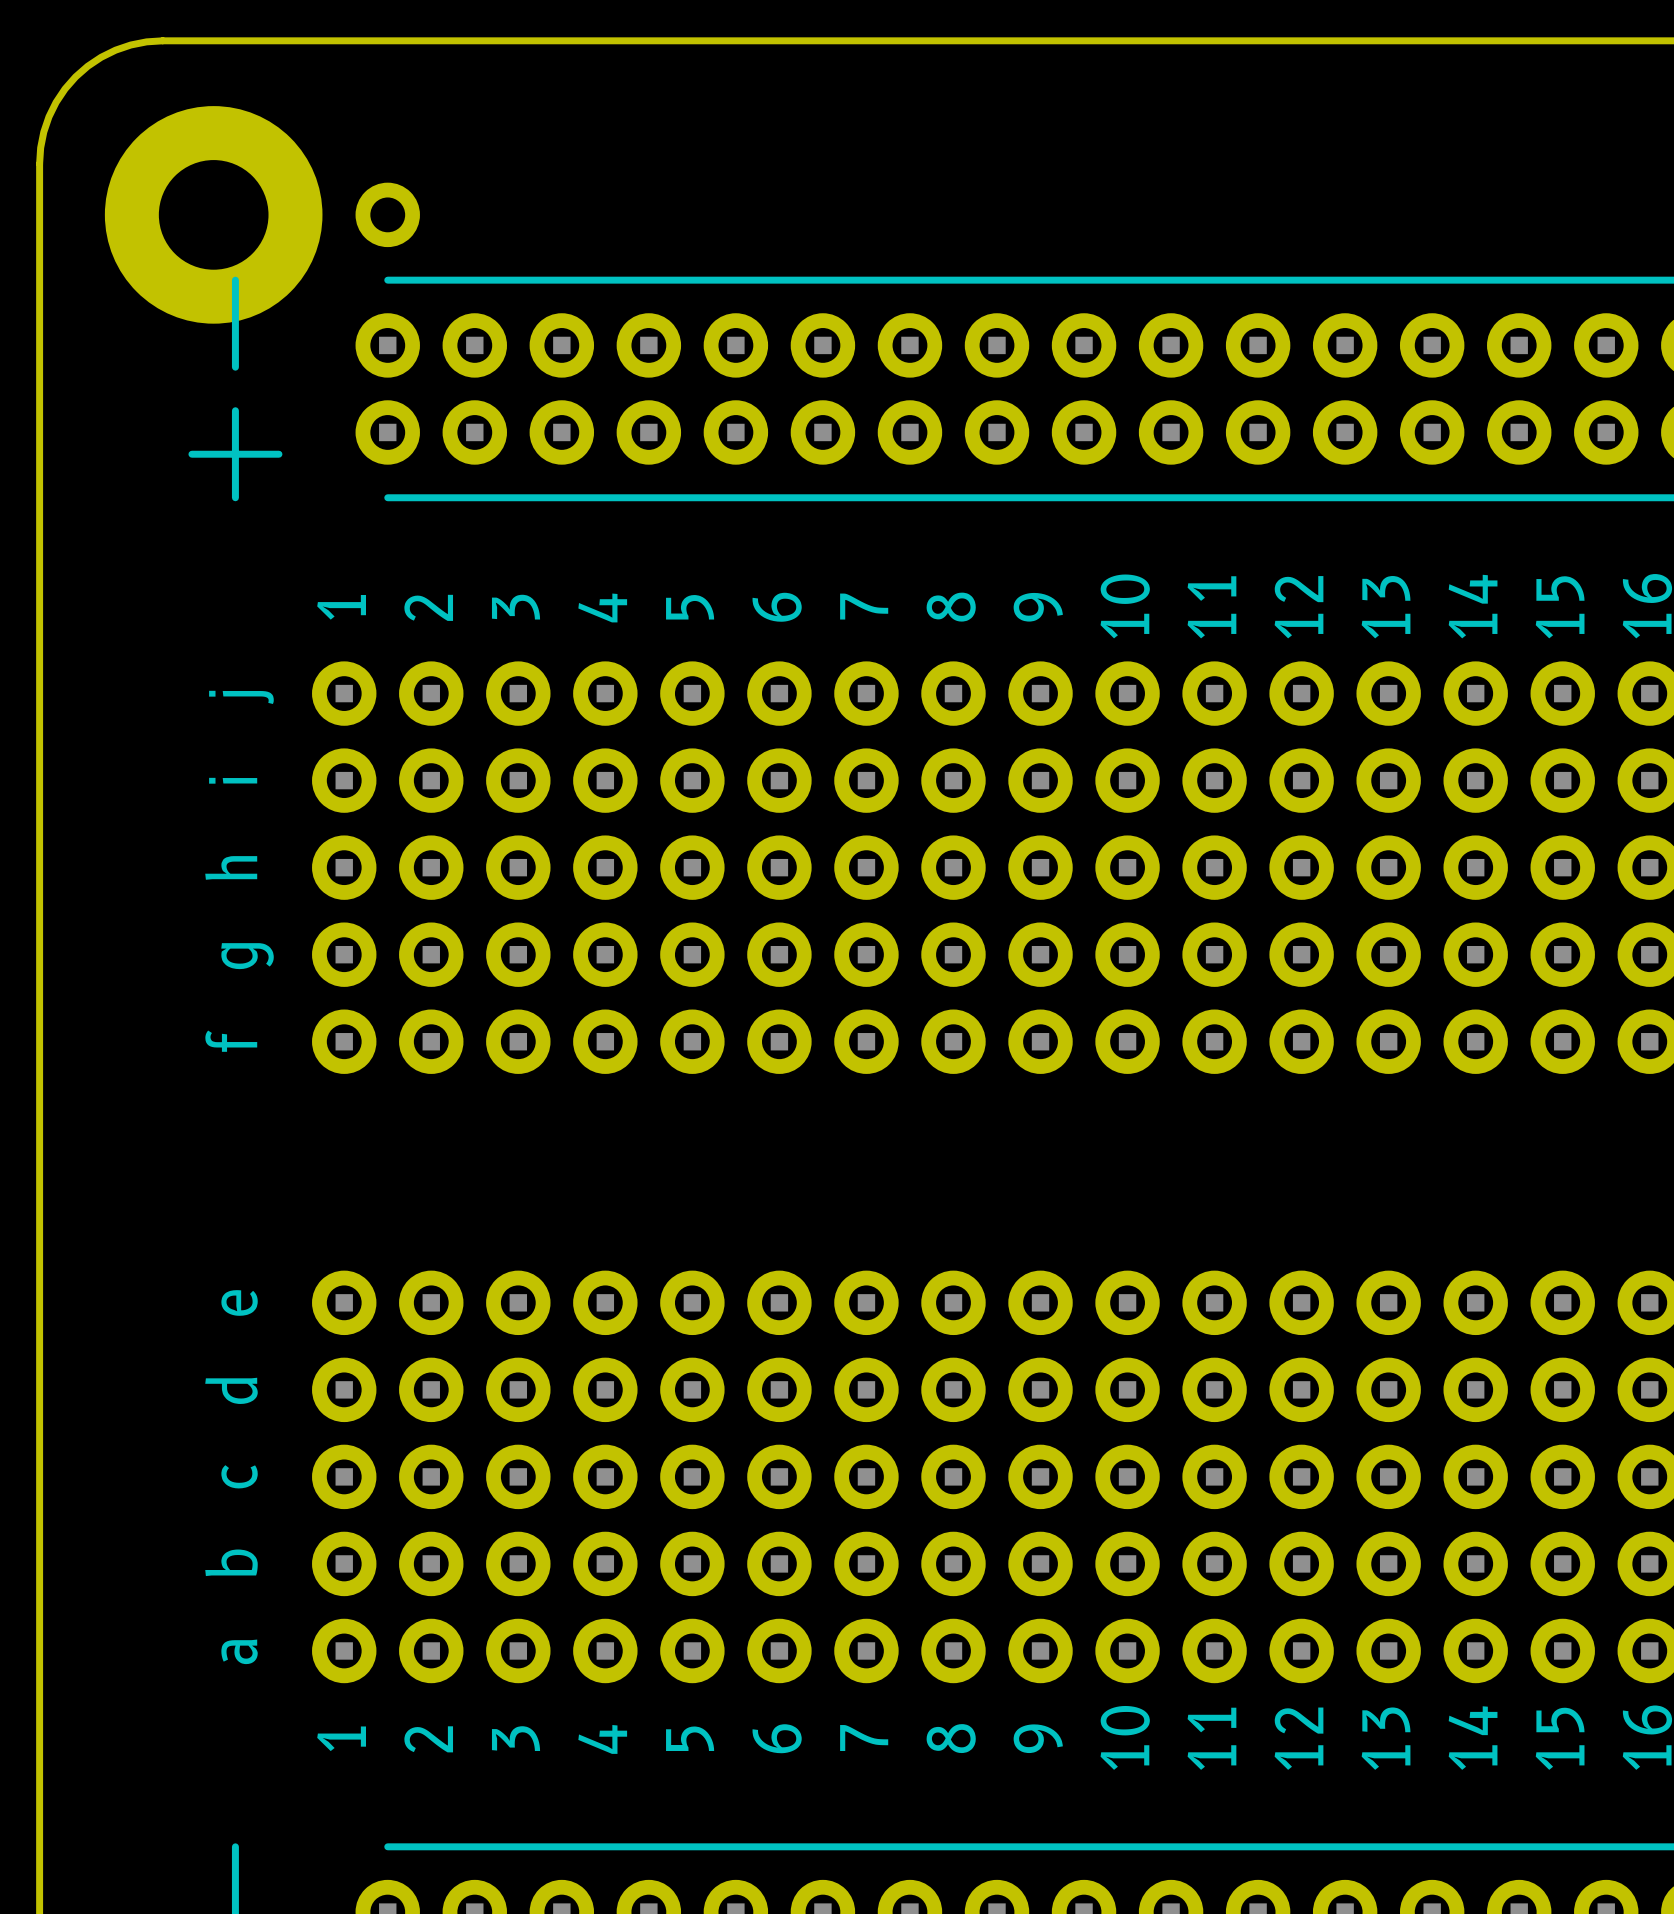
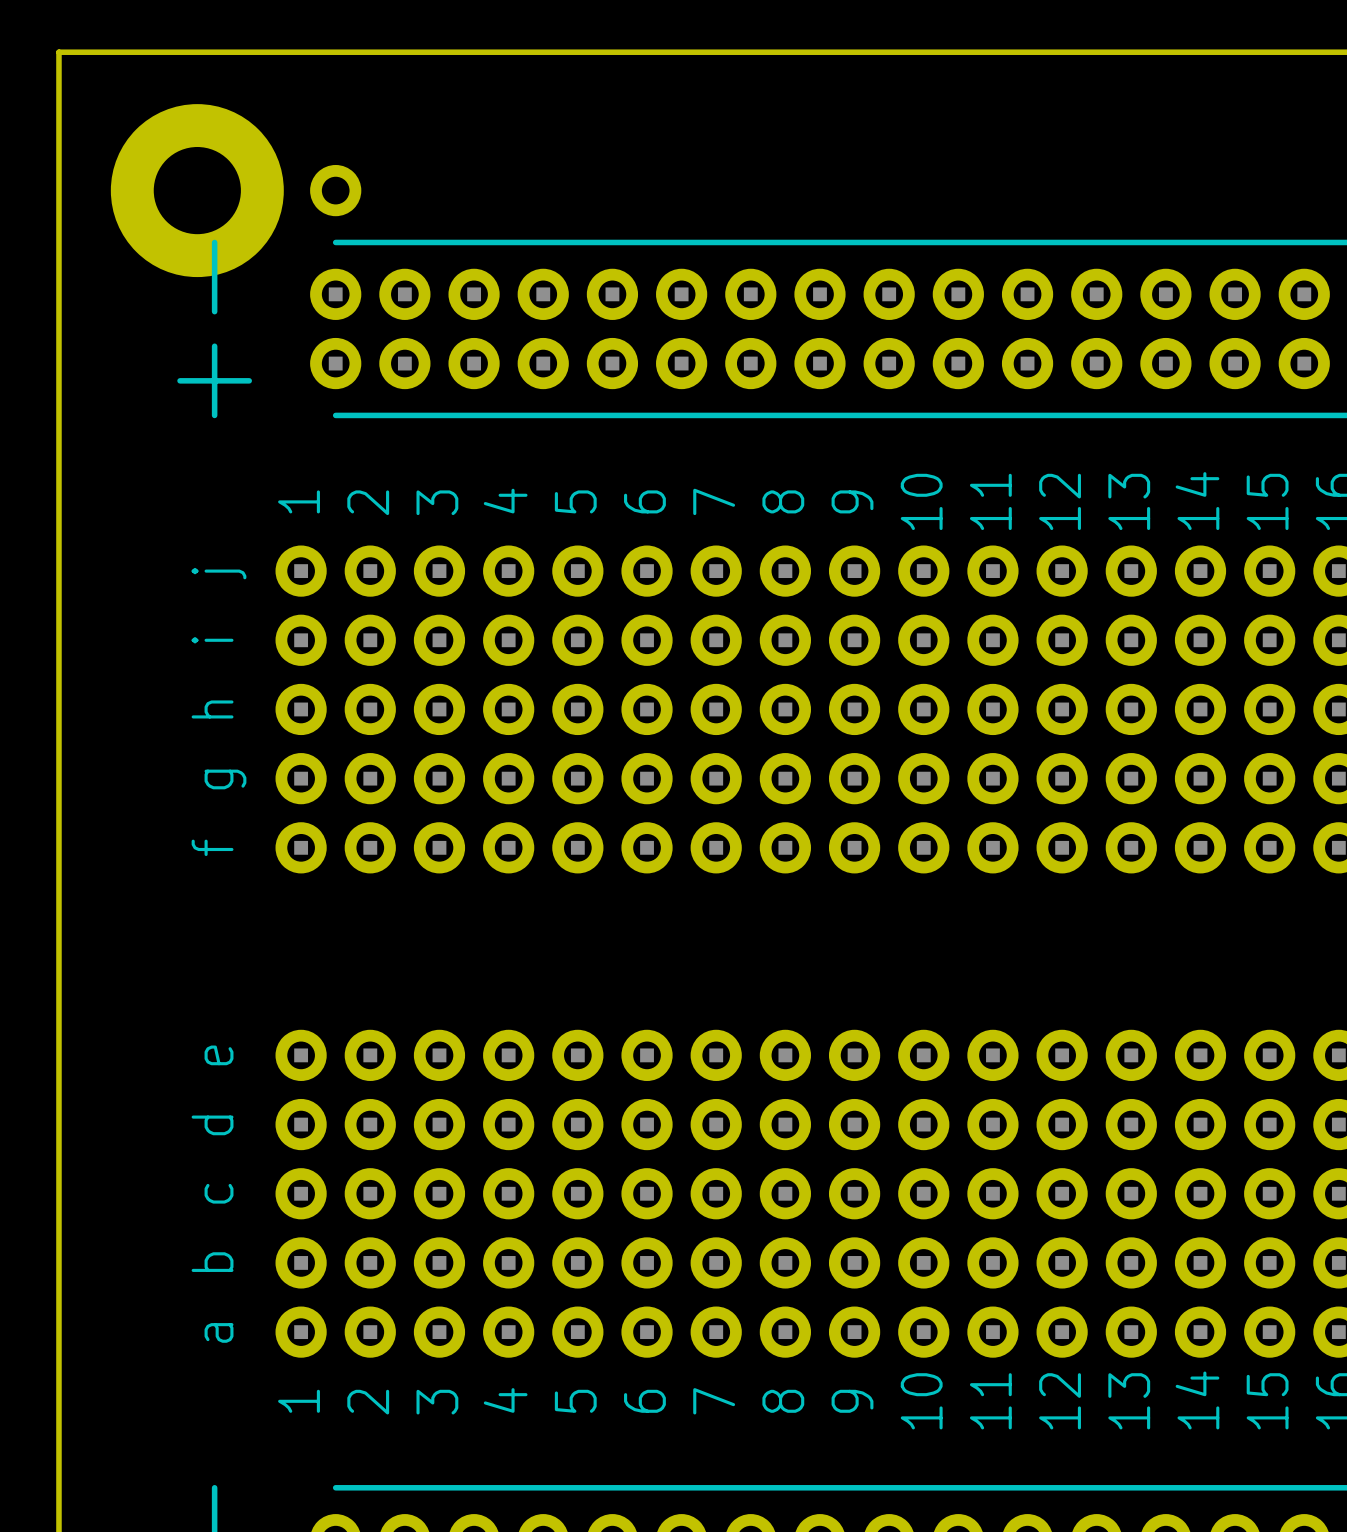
board edge: (162, 40) (146, 41) (115, 50) (101, 57) (75, 76) (65, 88) (48, 116) (40, 147) (39, 163) -> (156, 52) (58, 52) (58, 150)

